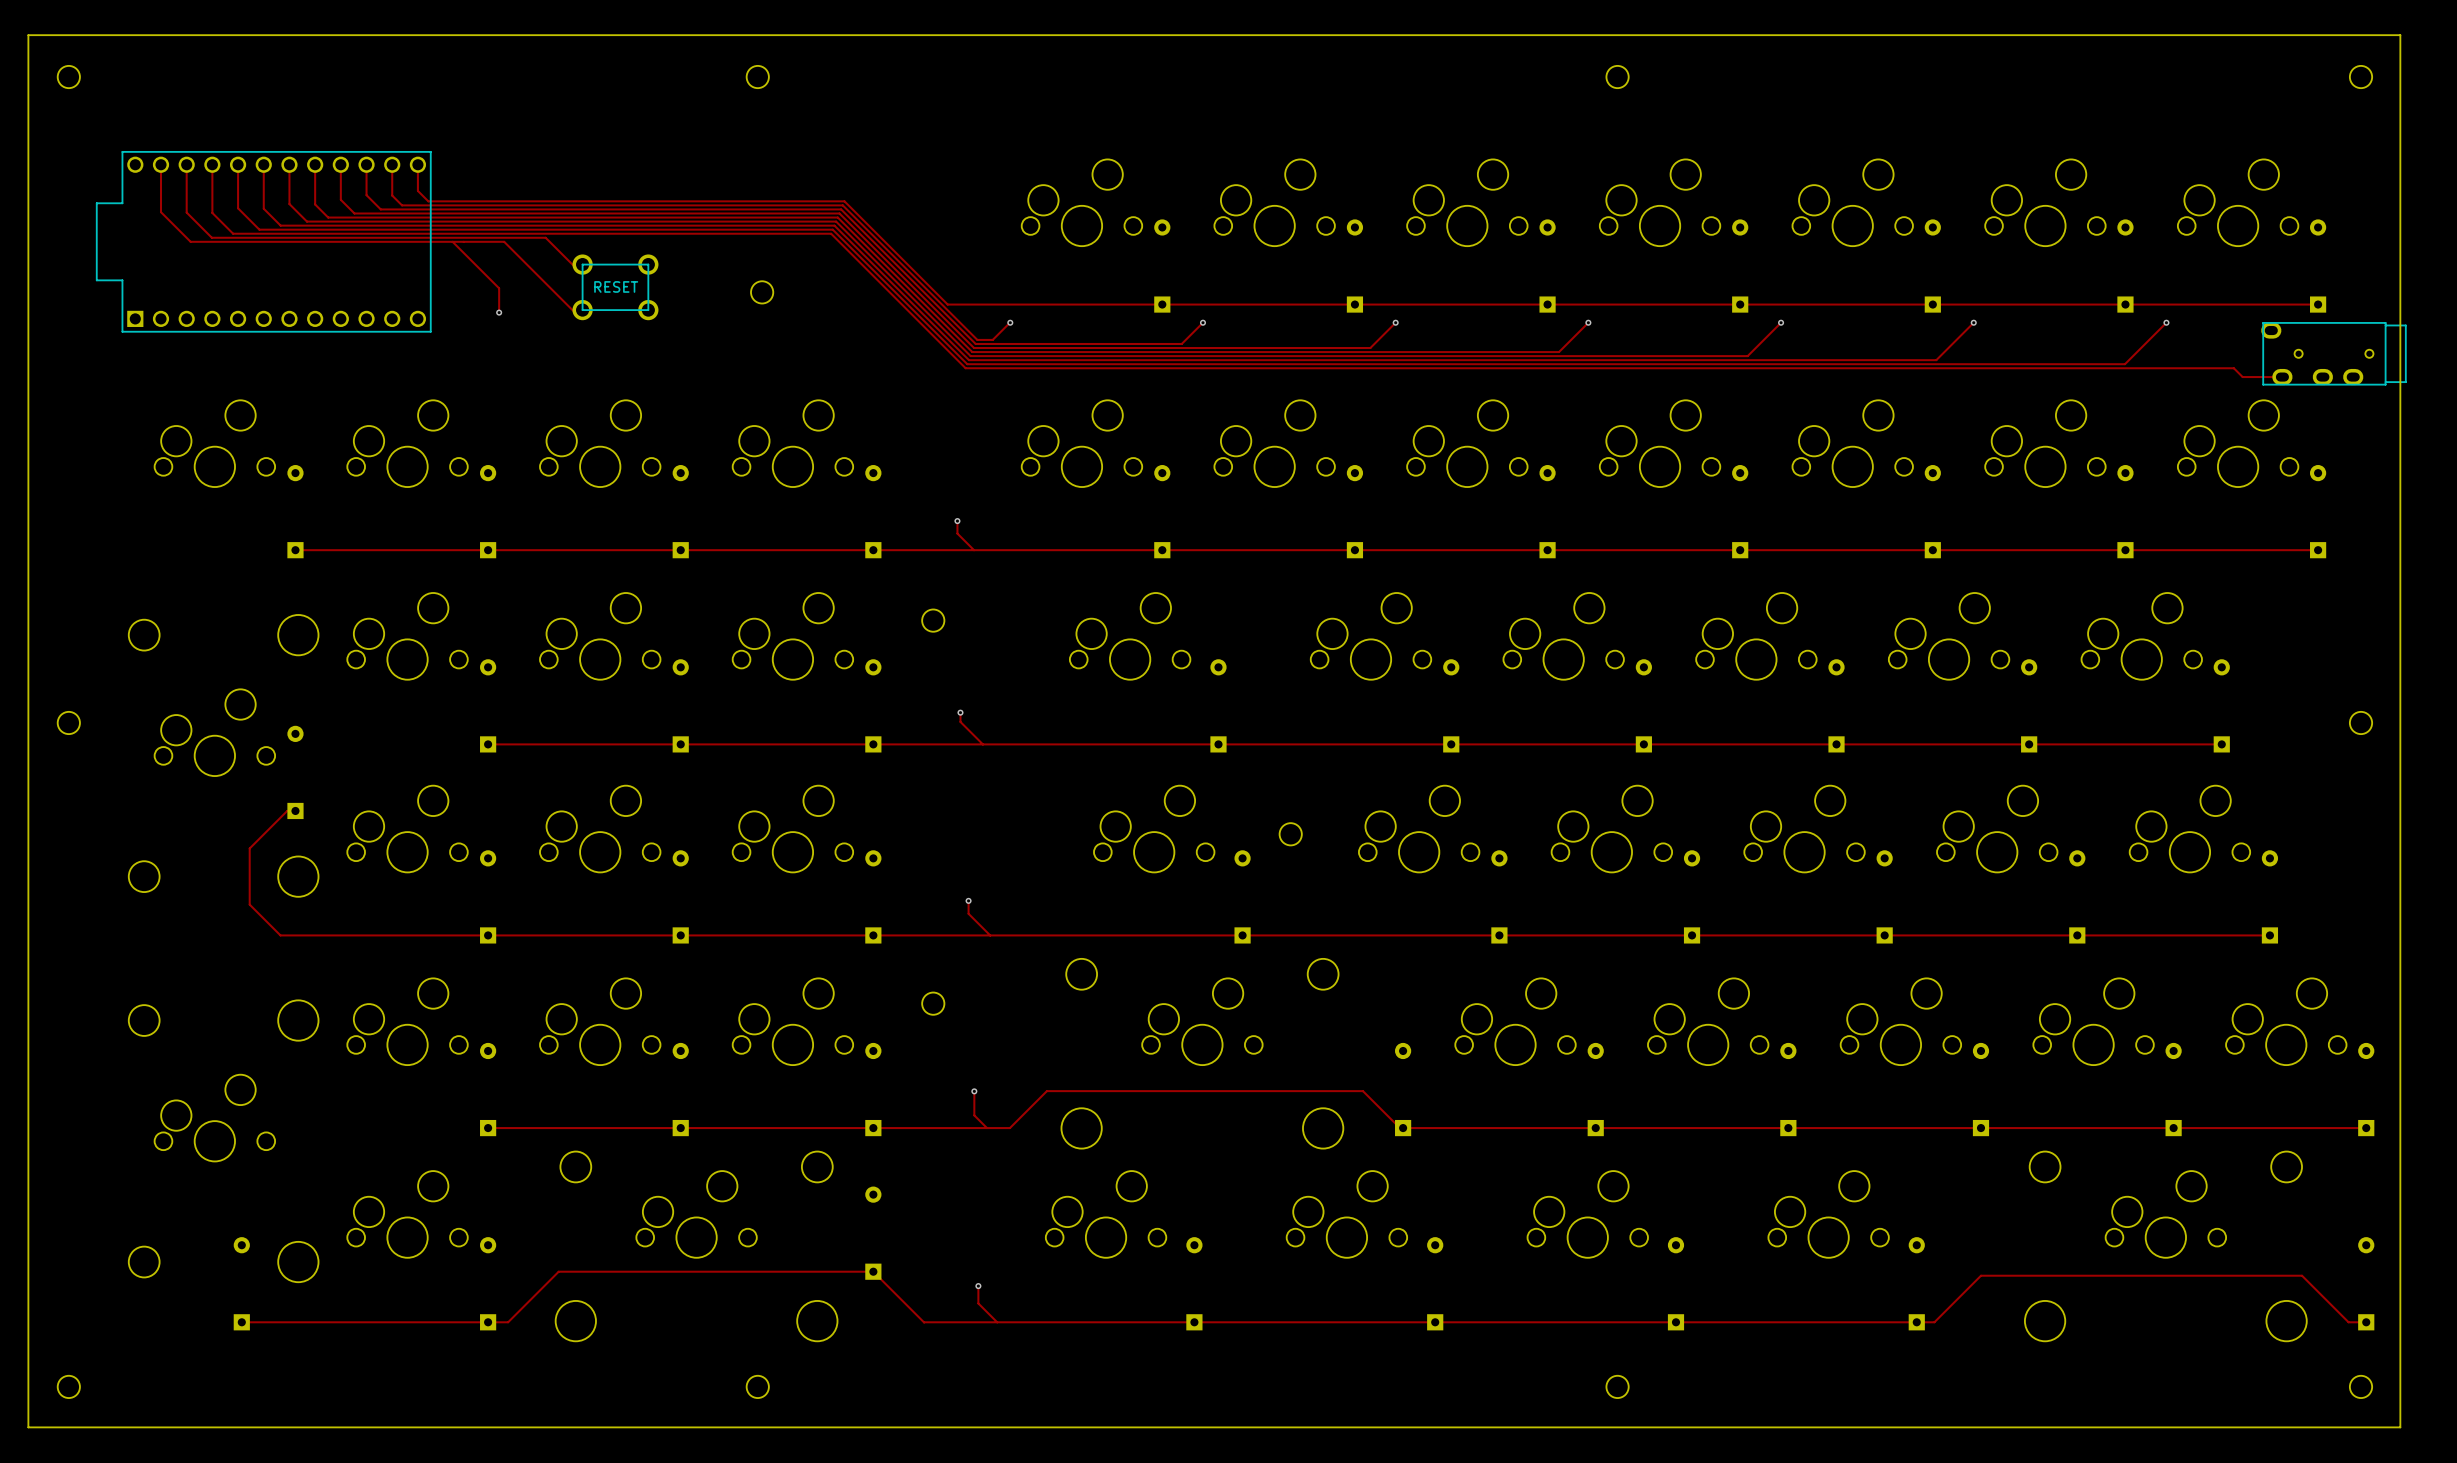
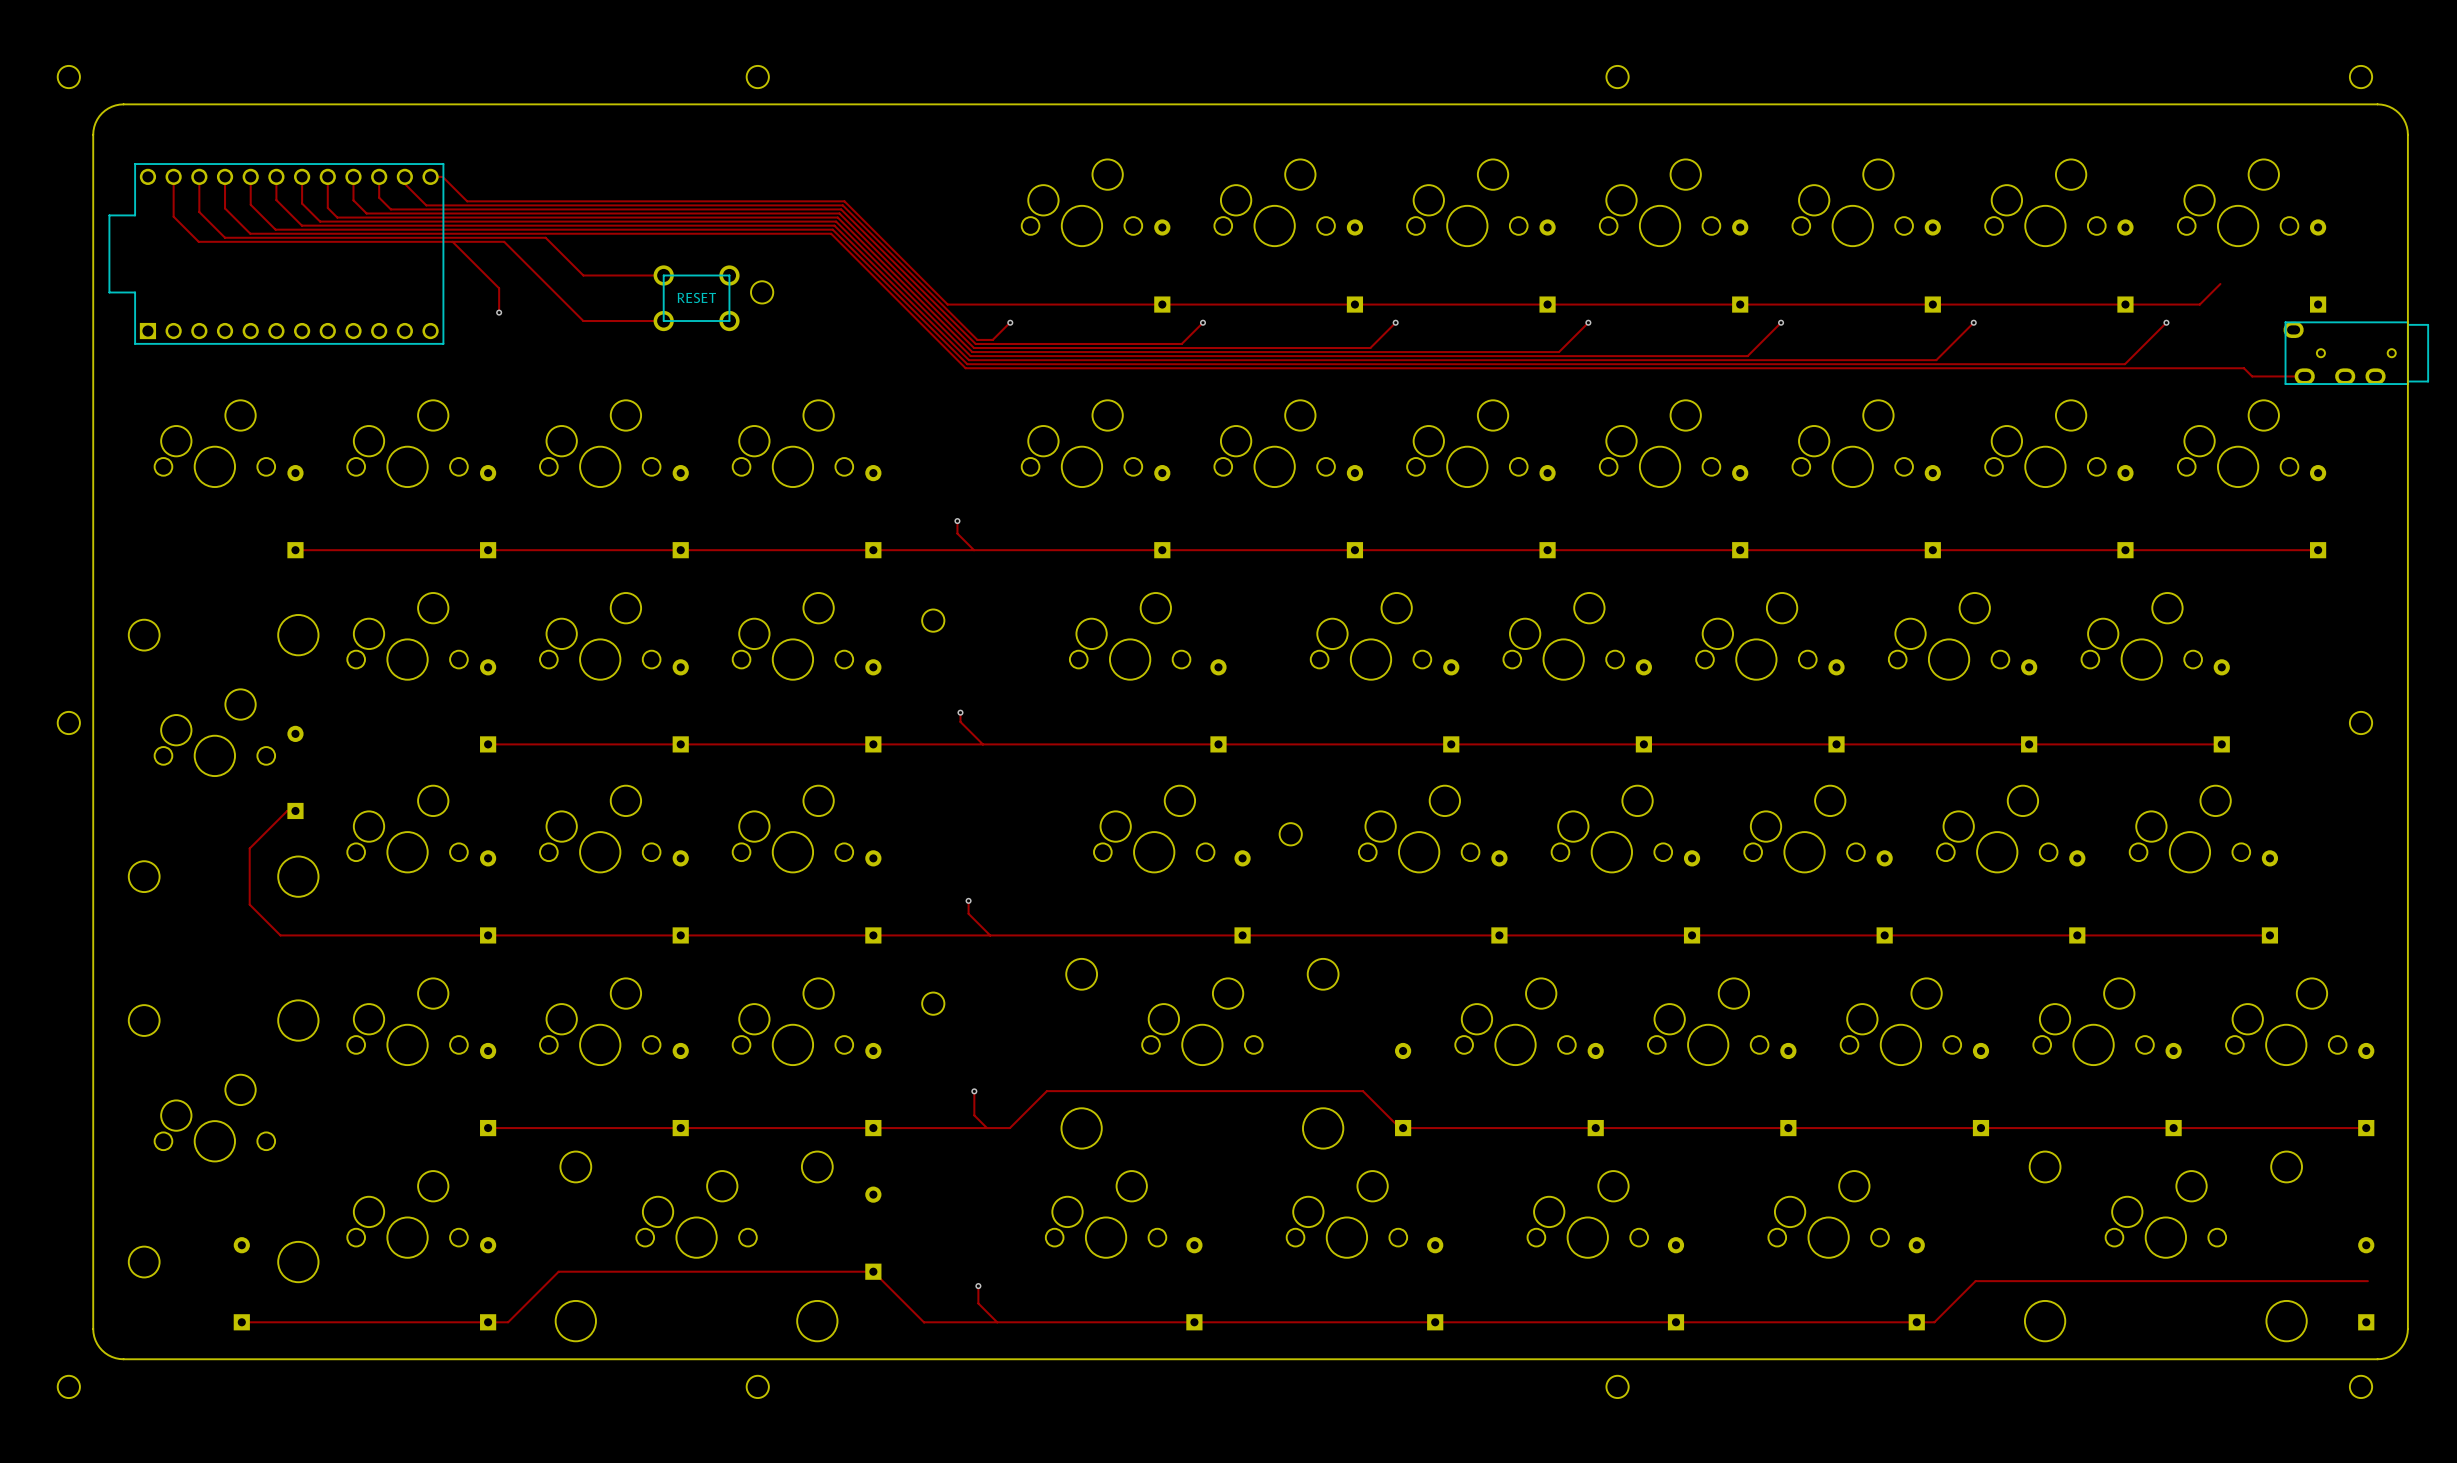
board edge: (28, 35) (2400, 35) (2400, 1427) (28, 1427) (28, 35) -> (123, 104) (111, 106) (102, 113) (95, 123) (93, 134) (93, 1328) (97, 1344) (108, 1355) (123, 1359) (2377, 1359) (2392, 1355) (2403, 1344) (2407, 1328) (2407, 134) (2403, 119) (2392, 108) (2377, 104) (123, 104)
track: (161, 164) (161, 212) (190, 241) (198, 241) -> (173, 176) (173, 216) (198, 241)
track: (186, 164) (186, 212) (211, 237) (225, 237) -> (199, 176) (199, 212) (225, 237)
track: (212, 164) (212, 212) (233, 233) (250, 233) -> (225, 176) (225, 208) (250, 233)
track: (238, 164) (238, 208) (259, 229) (275, 229) -> (250, 176) (250, 204) (275, 229)
track: (263, 164) (263, 208) (280, 225) (301, 225) -> (276, 176) (276, 200) (301, 225)
track: (289, 164) (289, 204) (306, 221) (320, 221) -> (302, 176) (302, 203) (320, 221)
track: (315, 164) (315, 204) (328, 217) (337, 217) -> (327, 176) (327, 208) (337, 217)
track: (340, 164) (340, 199) (354, 213) (366, 213) -> (353, 176) (353, 200) (366, 213)
track: (366, 164) (366, 195) (380, 209) (390, 209) -> (379, 176) (379, 197) (390, 209)
track: (392, 164) (392, 195) (402, 205) (426, 205) -> (404, 176) (404, 183) (426, 205)
track: (417, 164) (417, 190) (428, 201) (467, 201) -> (430, 176) (442, 176) (467, 201)
part position: (263, 241) -> (276, 253)
track: none -> (577, 269) (583, 275) (663, 275)
part position: (615, 287) -> (696, 298)
track: (2199, 304) (2318, 304) -> (2199, 304) (2220, 283)
track: none -> (577, 315) (583, 321) (663, 321)
part position: (2333, 353) -> (2356, 353)
track: (2233, 368) (2242, 377) (2282, 377) -> (2233, 368) (2243, 368) (2252, 376) (2304, 376)
track: (1975, 1281) (1980, 1275) (2302, 1275) (2348, 1322) (2366, 1322) -> (1975, 1281) (2367, 1281)

